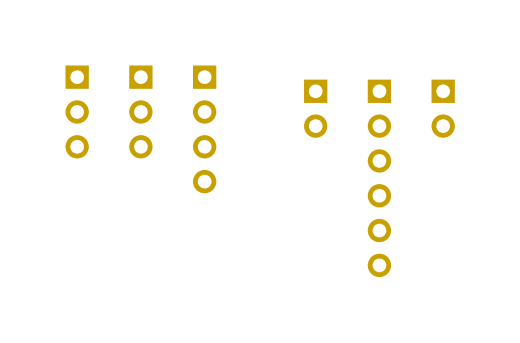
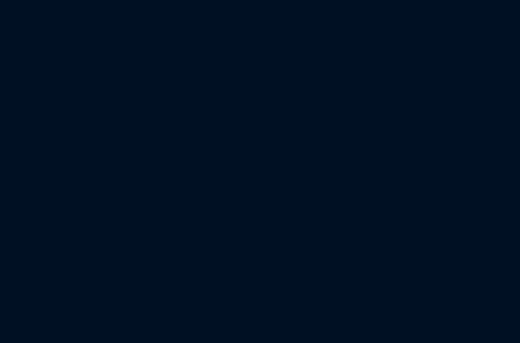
part: (315, 108) -> none
part: (443, 108) -> none
part: (77, 111) -> none
part: (140, 111) -> none
part: (204, 129) -> none
part: (379, 178) -> none

